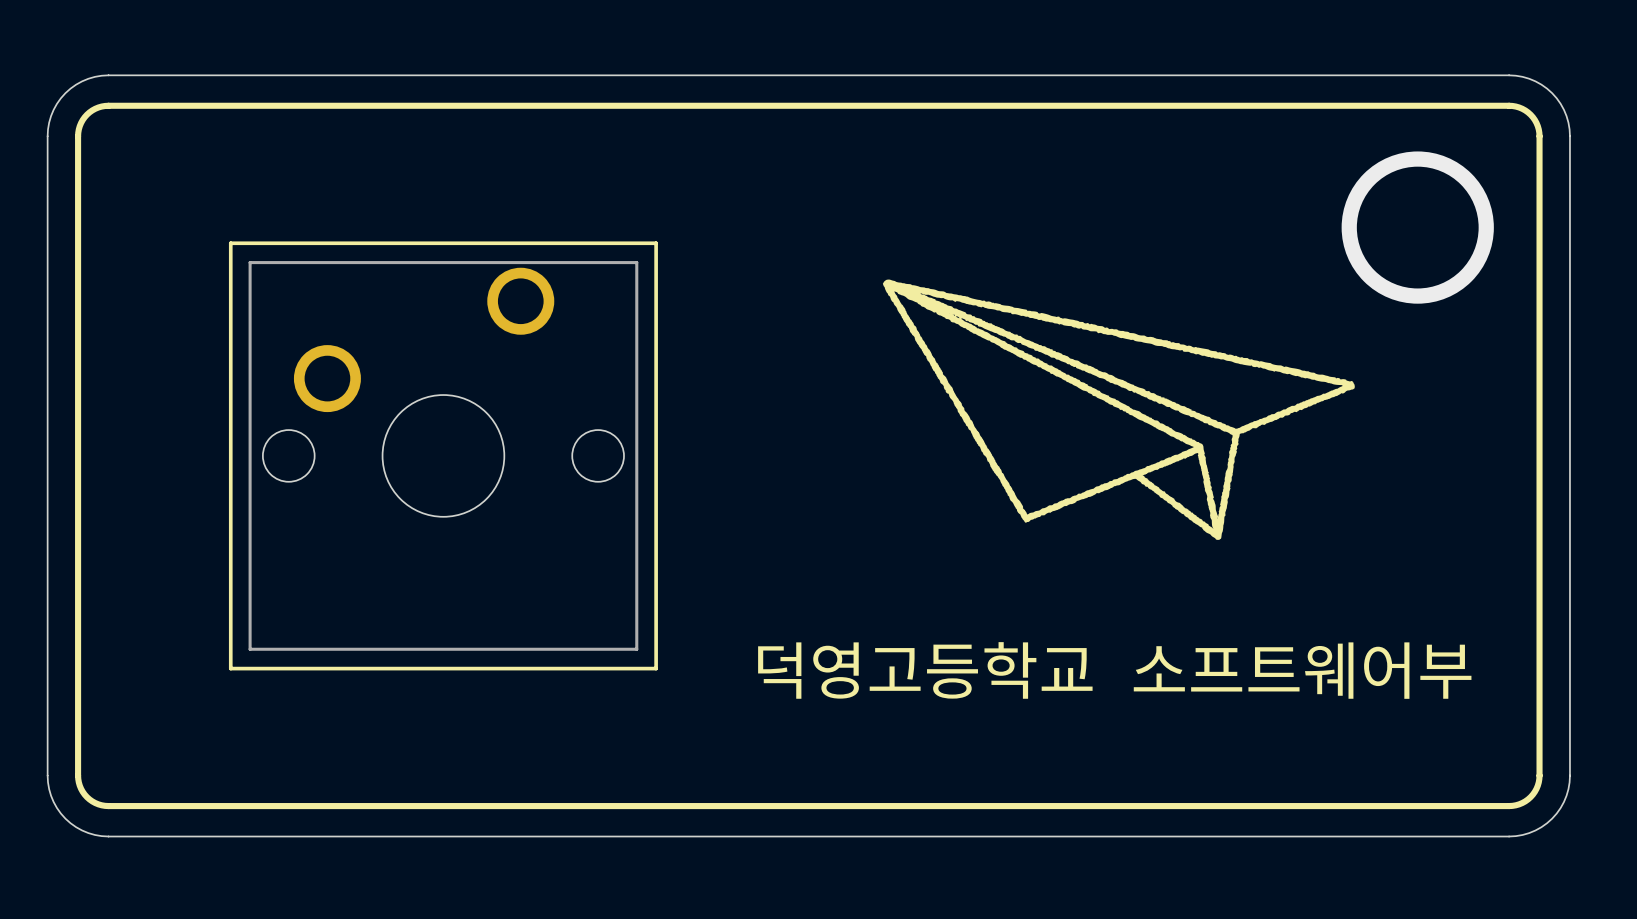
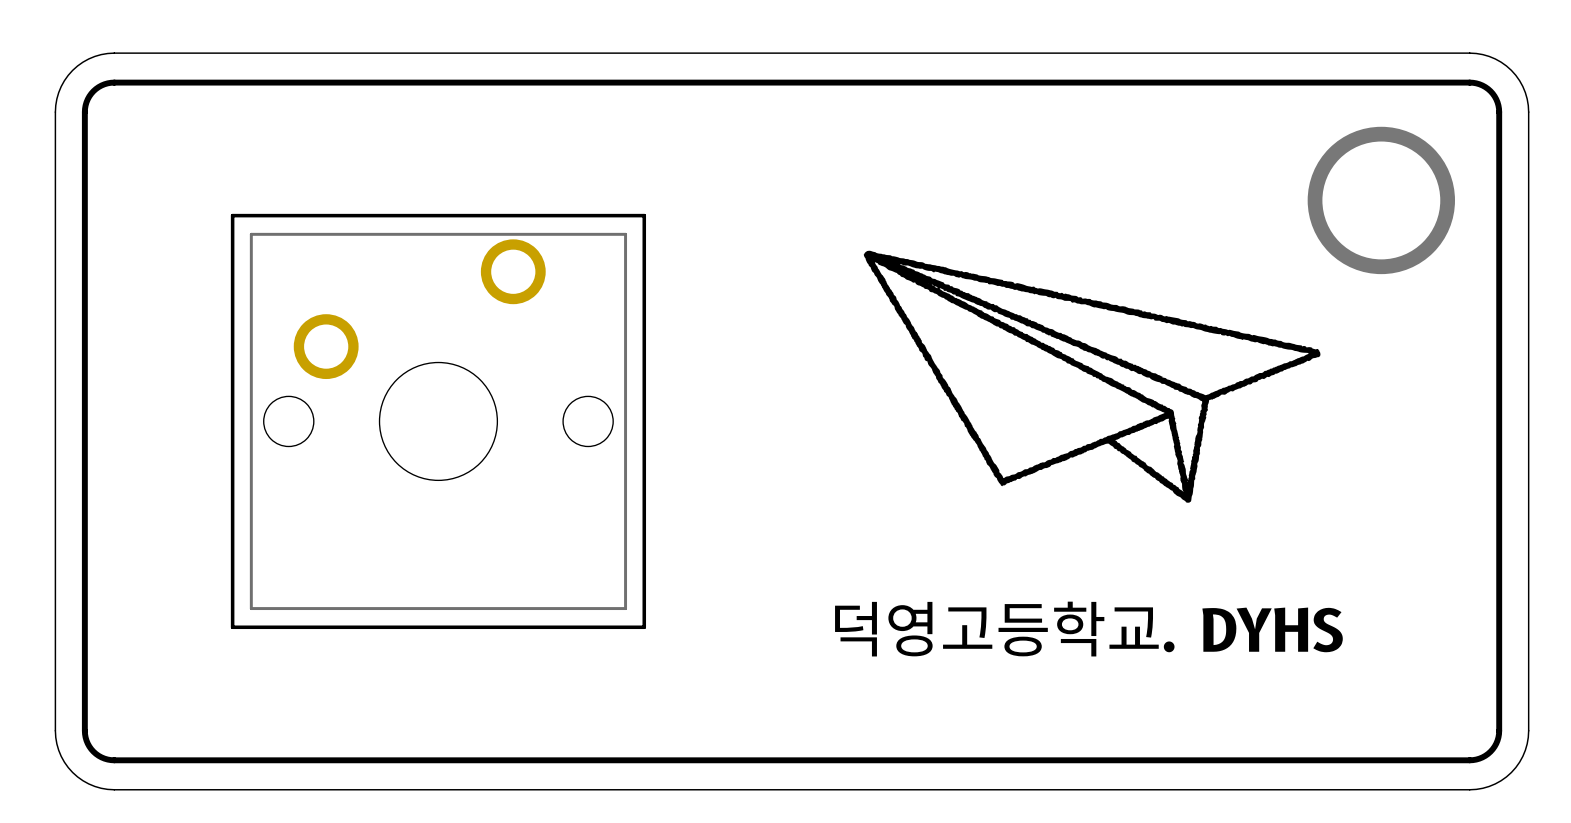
text: 덕영고등학교 소프트웨어부 (1114, 670) -> 덕영고등학교. DYHS (1088, 629)

